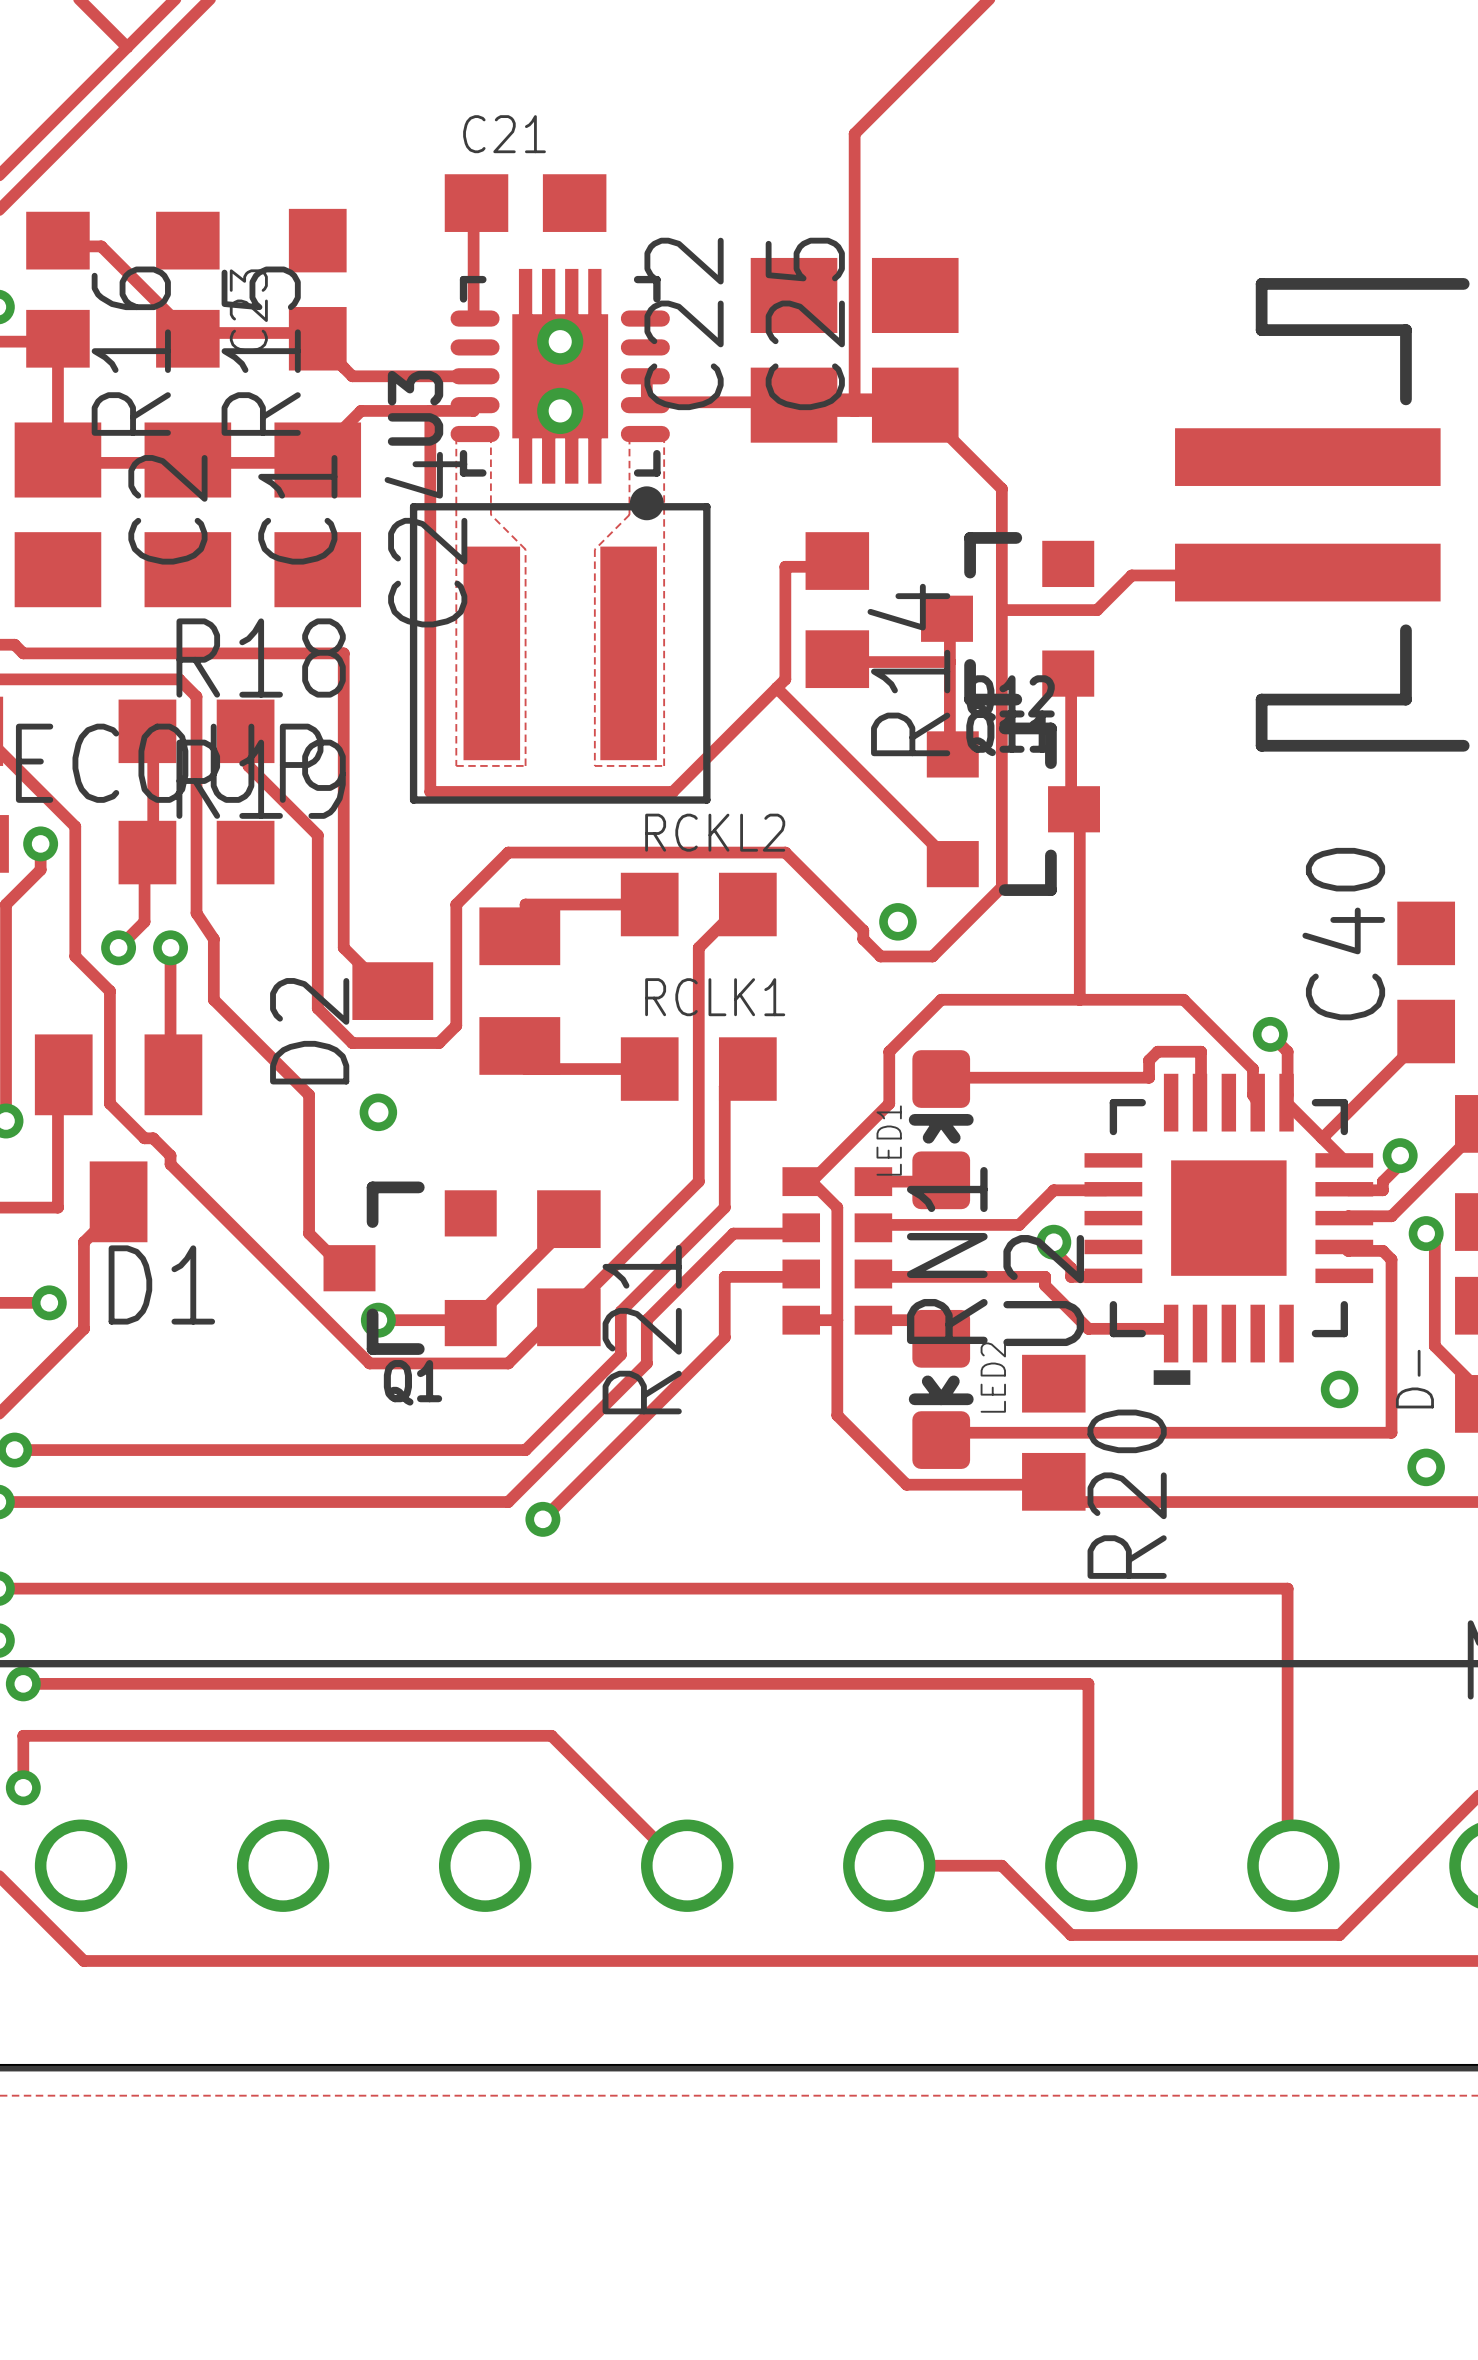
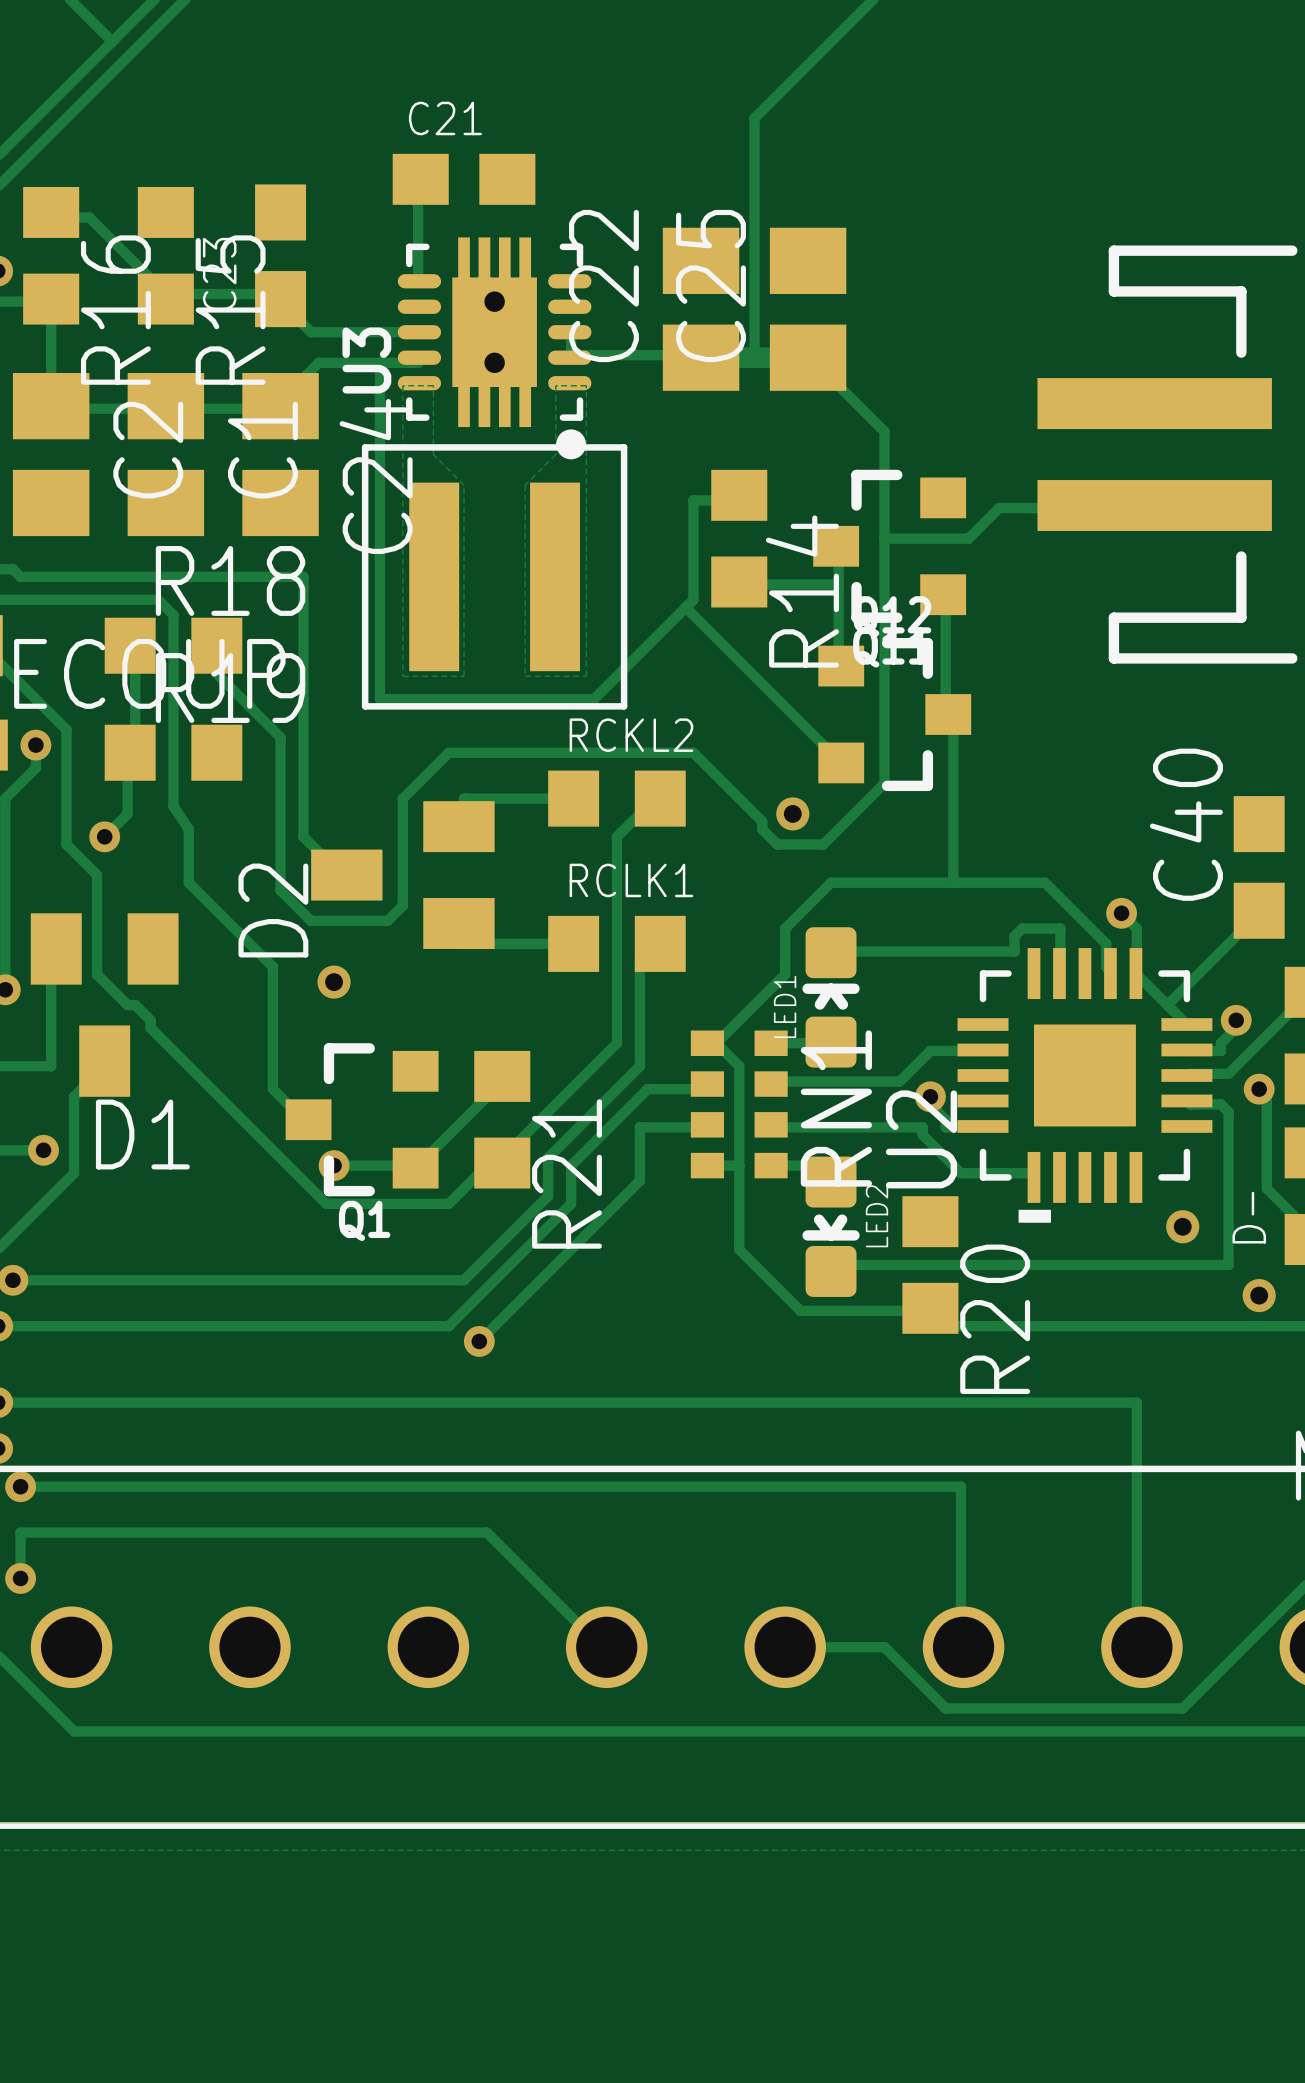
track: (170, 947) (170, 1069) (173, 1074) -> none
via: (170, 947) -> none

